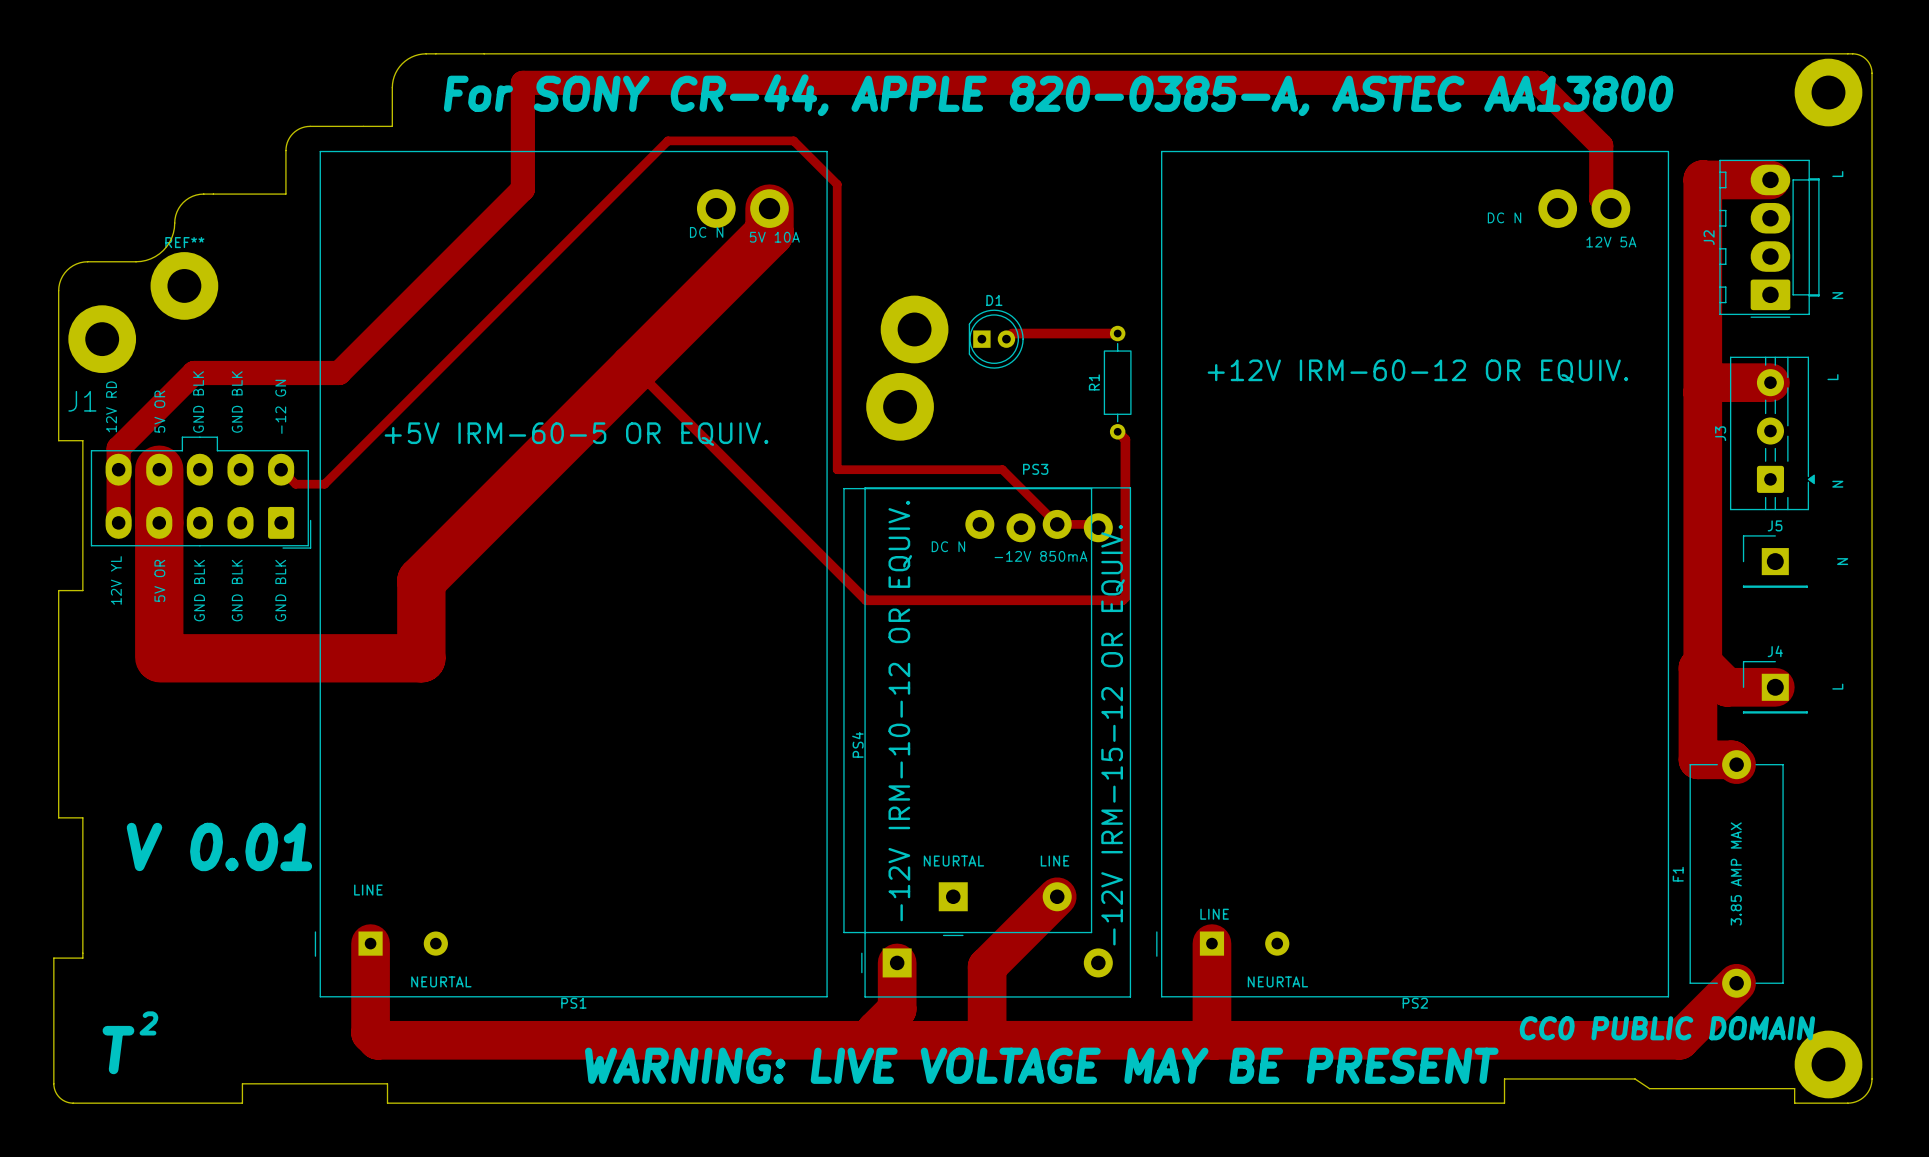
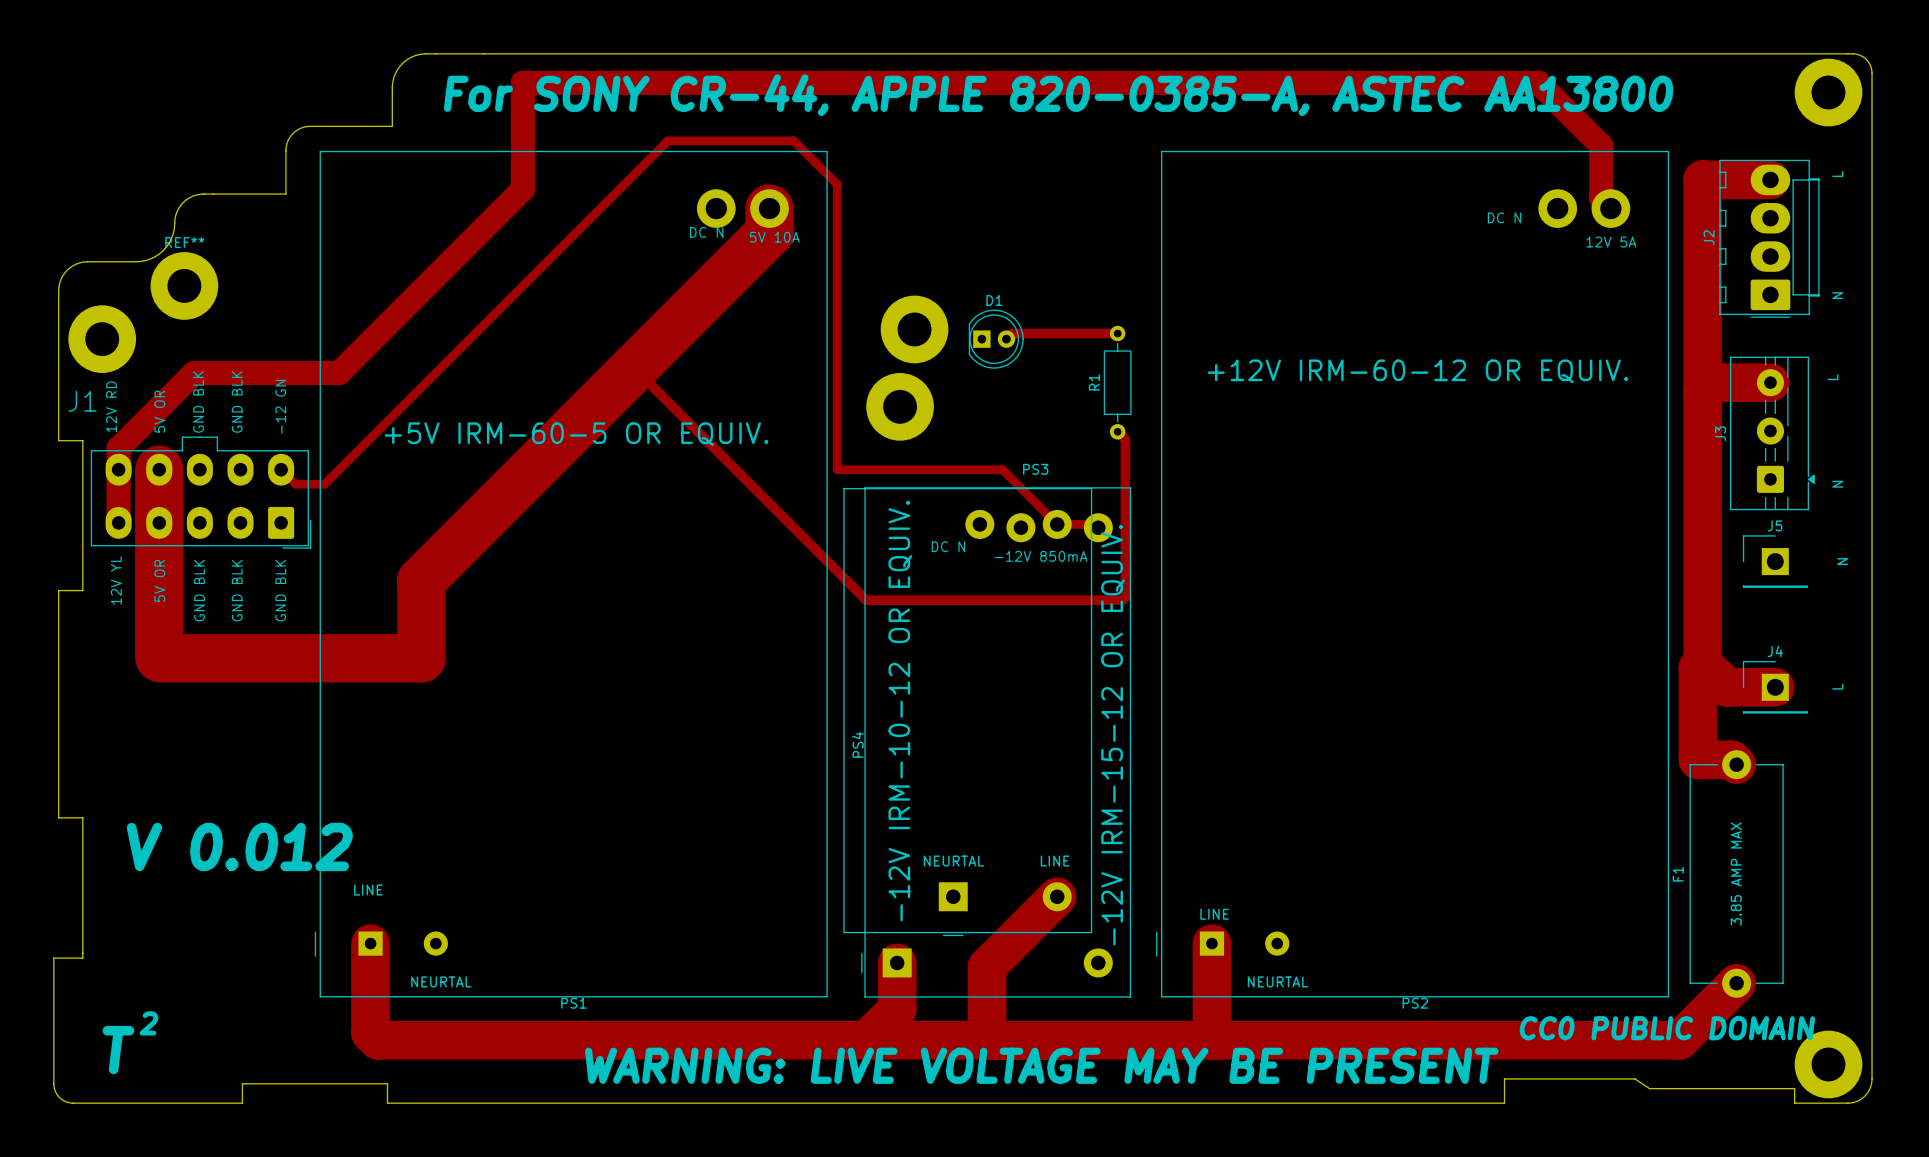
text: V 0.01 (219, 846) -> V 0.012 (239, 846)

